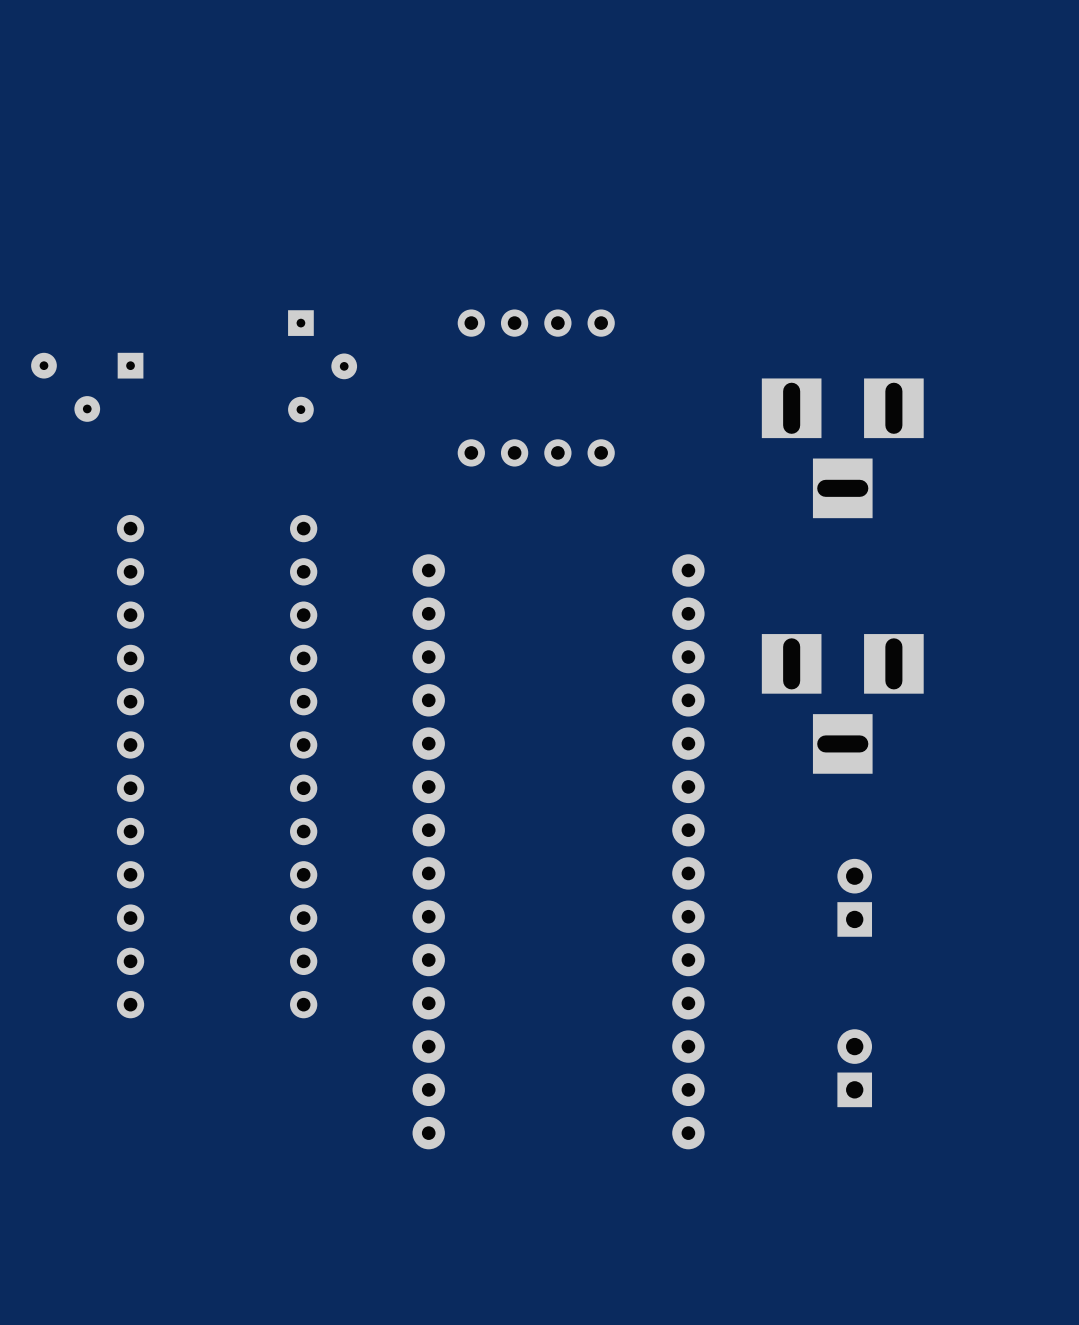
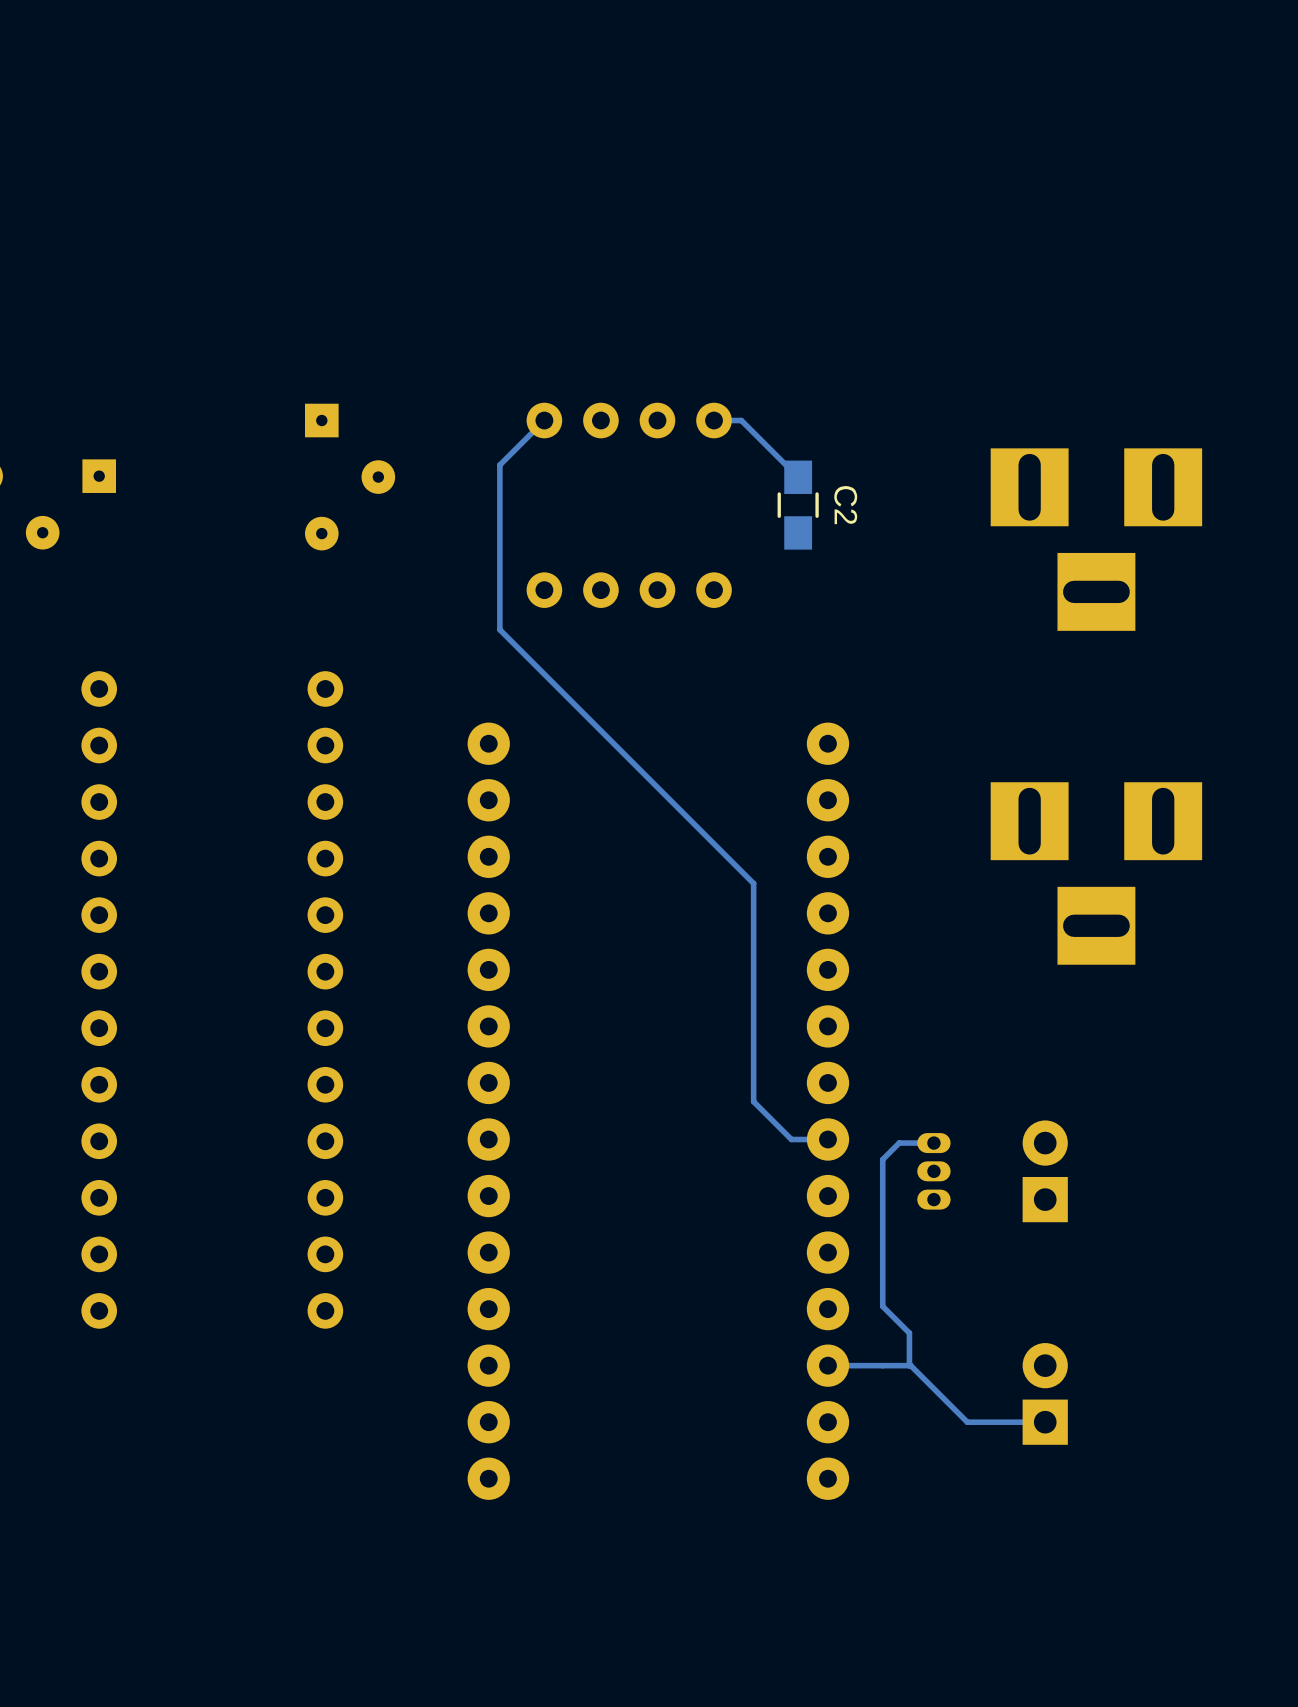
track: none -> (544, 420) (499, 465) (499, 629) (753, 883) (753, 1101) (791, 1139) (827, 1139)
track: none -> (714, 420) (741, 420) (798, 477)
C2: none -> (798, 505)
part position: (842, 448) -> (1096, 539)
part position: (842, 703) -> (1096, 873)
track: none -> (933, 1143) (899, 1143) (882, 1159) (882, 1306) (909, 1333) (909, 1365)
part: none -> (933, 1171)
track: none -> (827, 1365) (910, 1365) (967, 1422) (1045, 1422)

